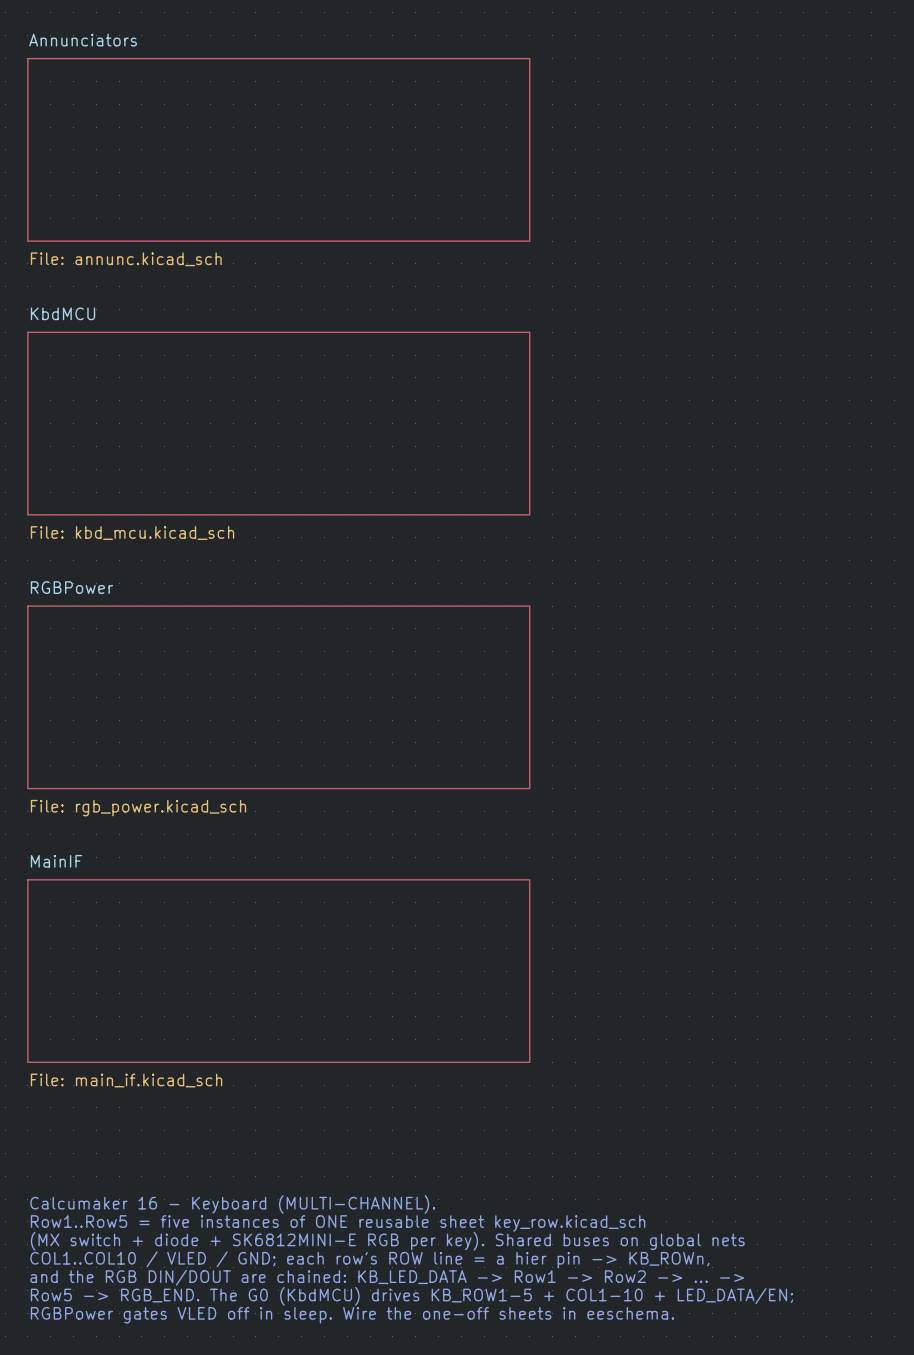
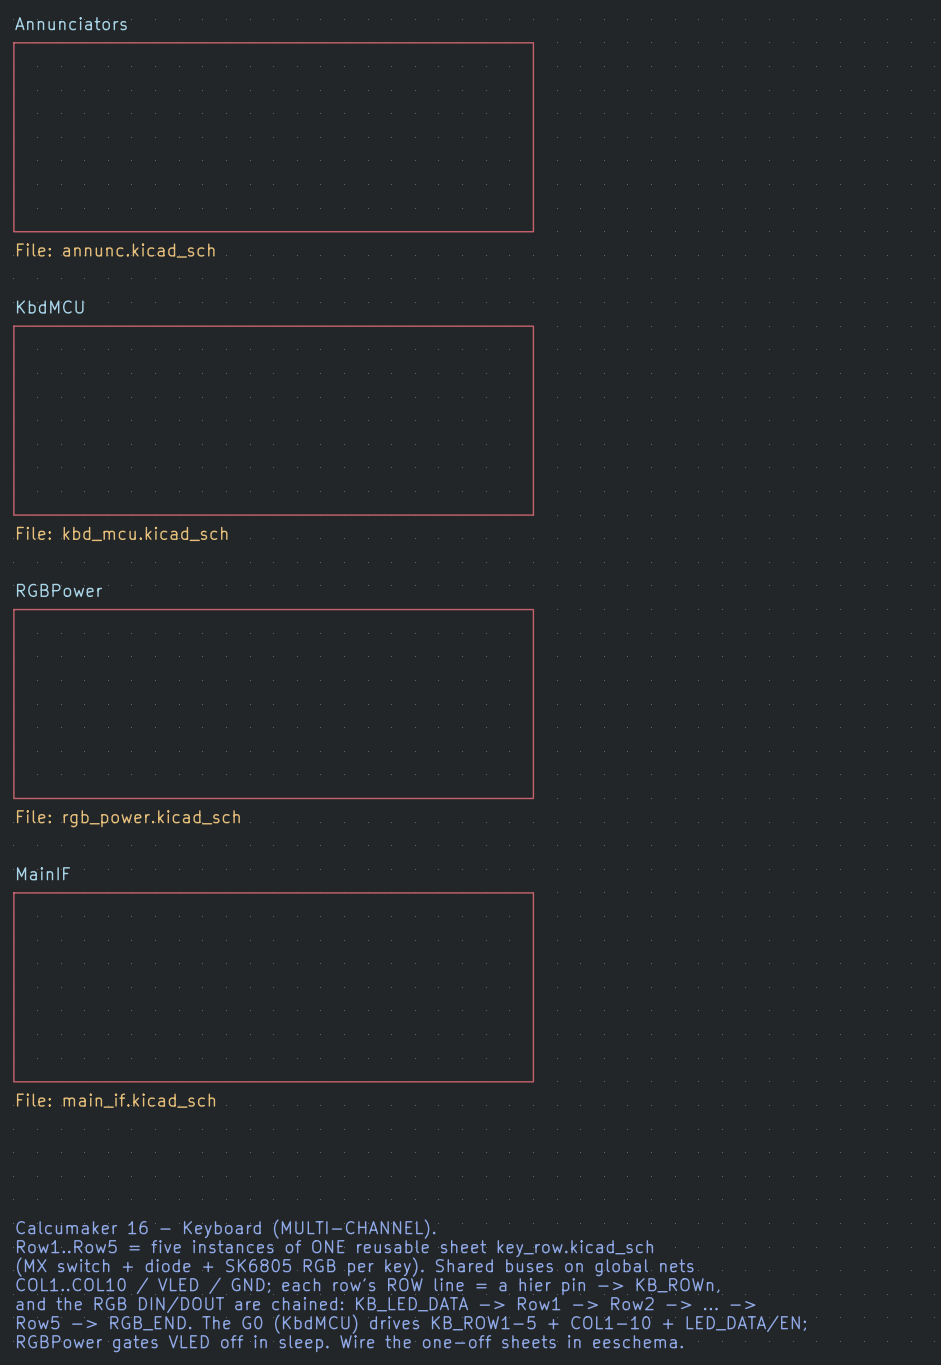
text: (MX switch + diode + SK6812MINI-E RGB per key). Shared buses on global nets (387, 1241) -> (MX switch + diode + SK6805 RGB per key). Shared buses on global nets (355, 1267)

